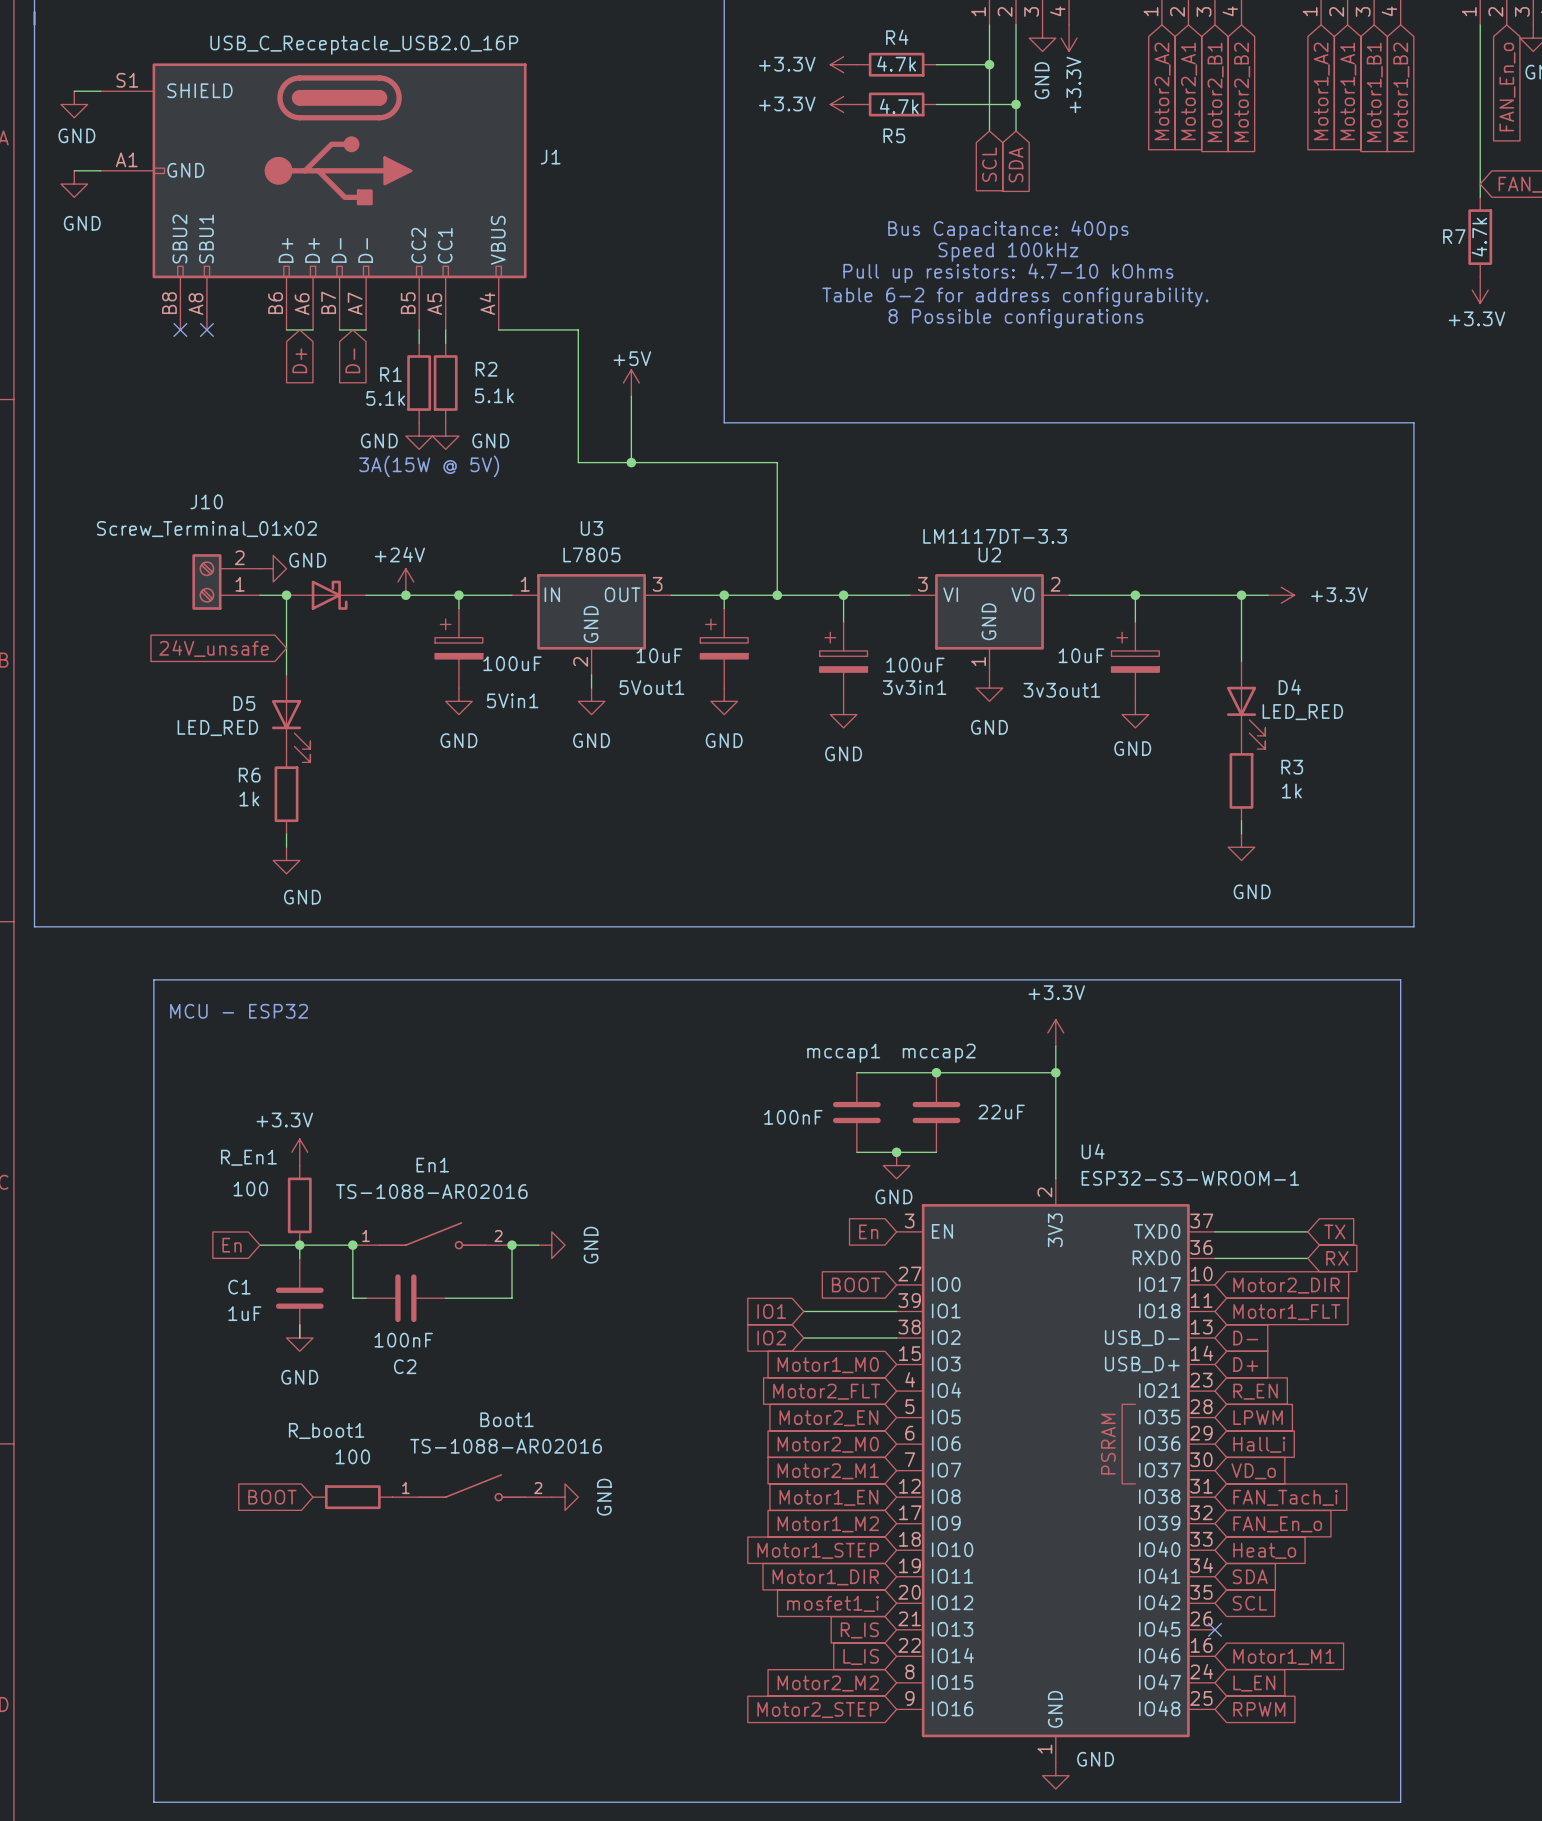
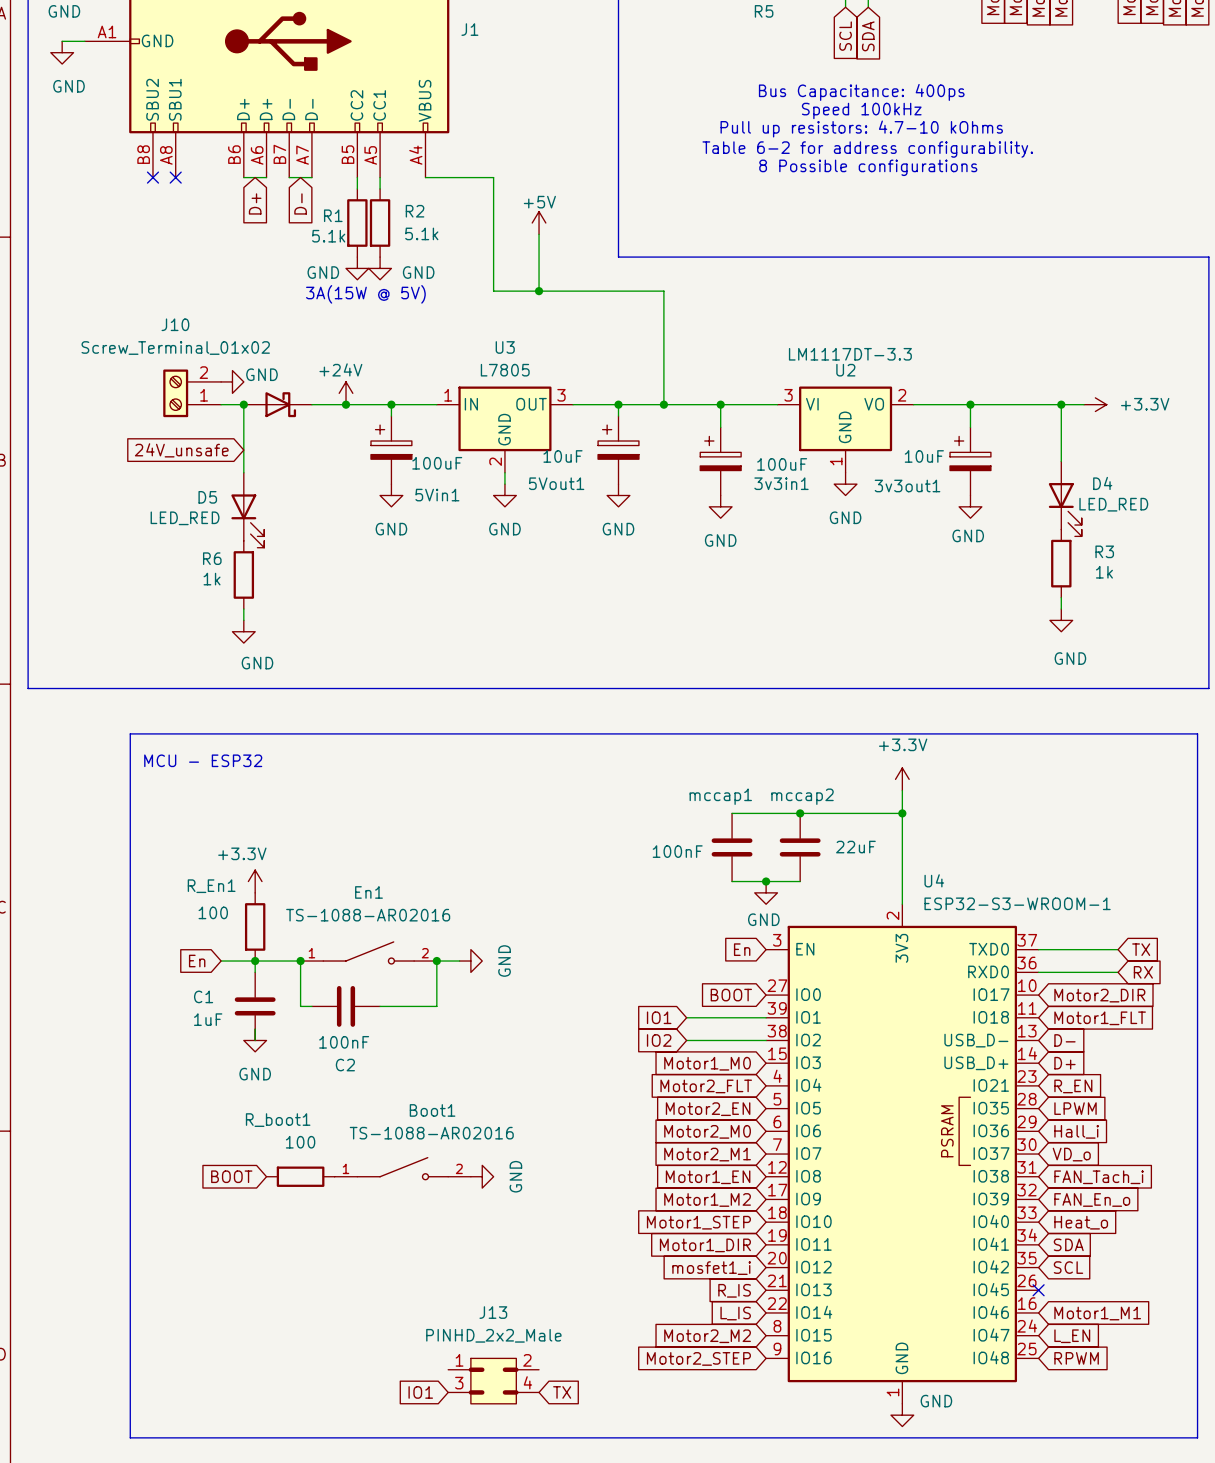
J13: none -> PINHD_2x2_Male (493, 1381)
global label: none -> IO1 (420, 1392)
global label: none -> TX (562, 1392)

